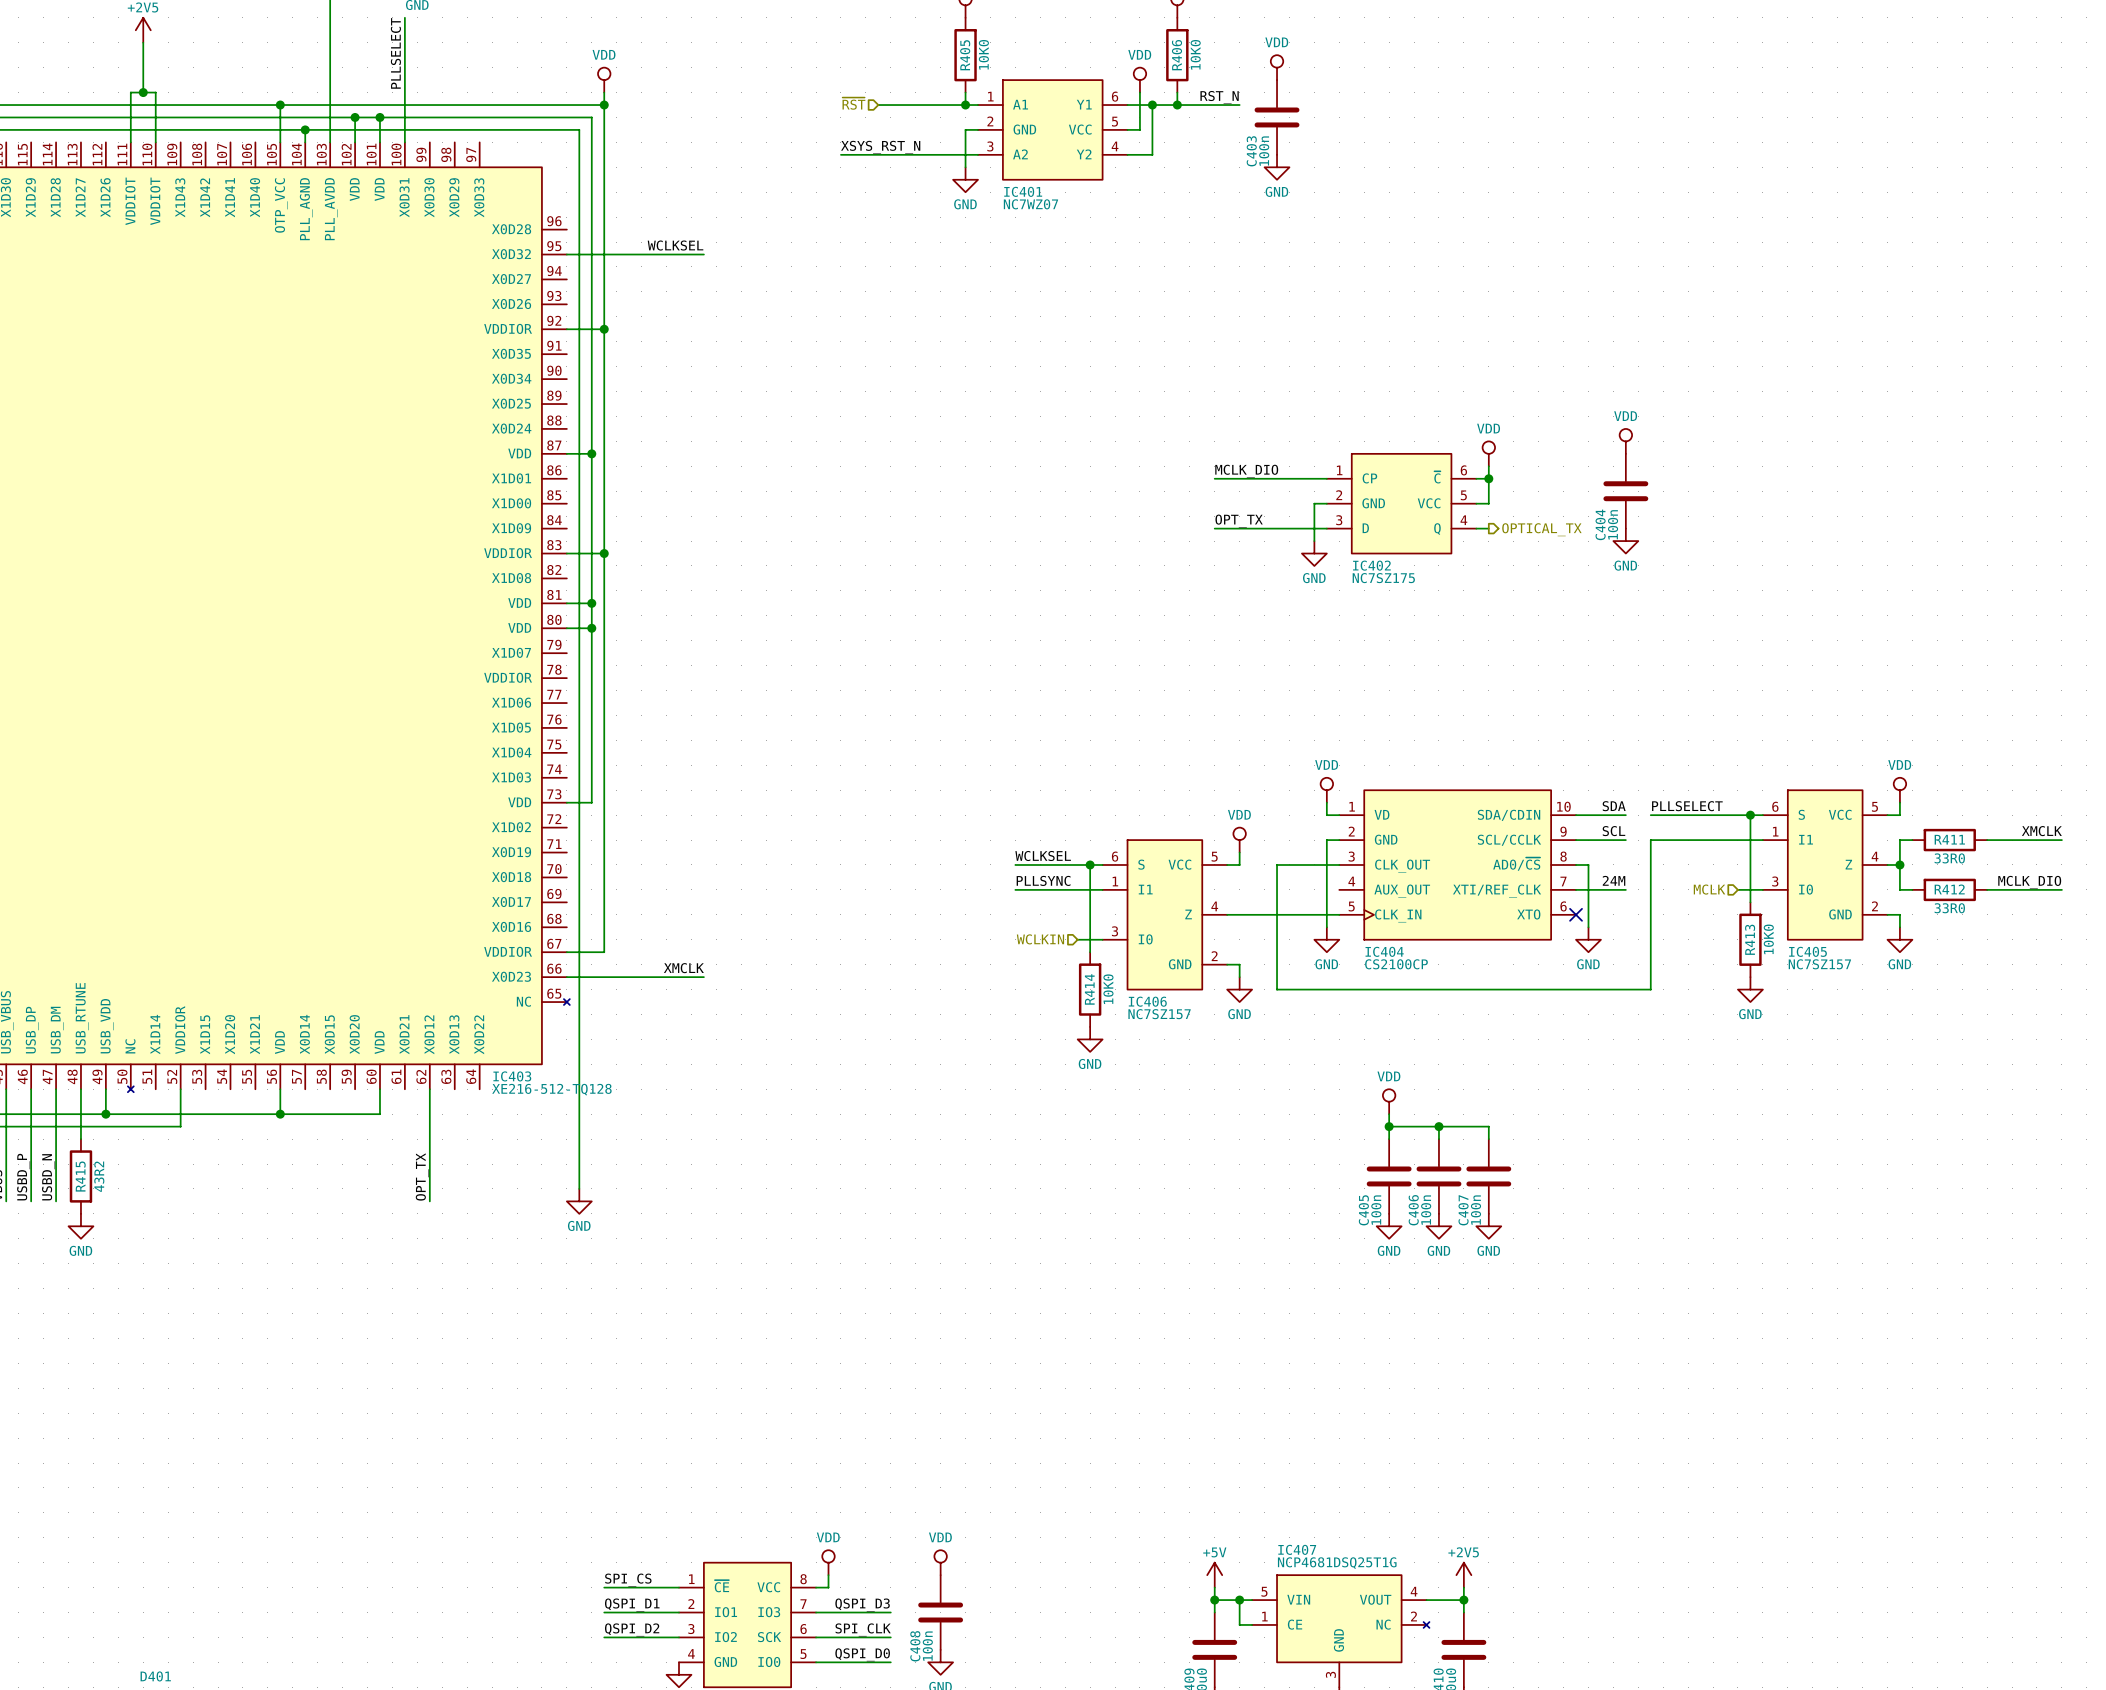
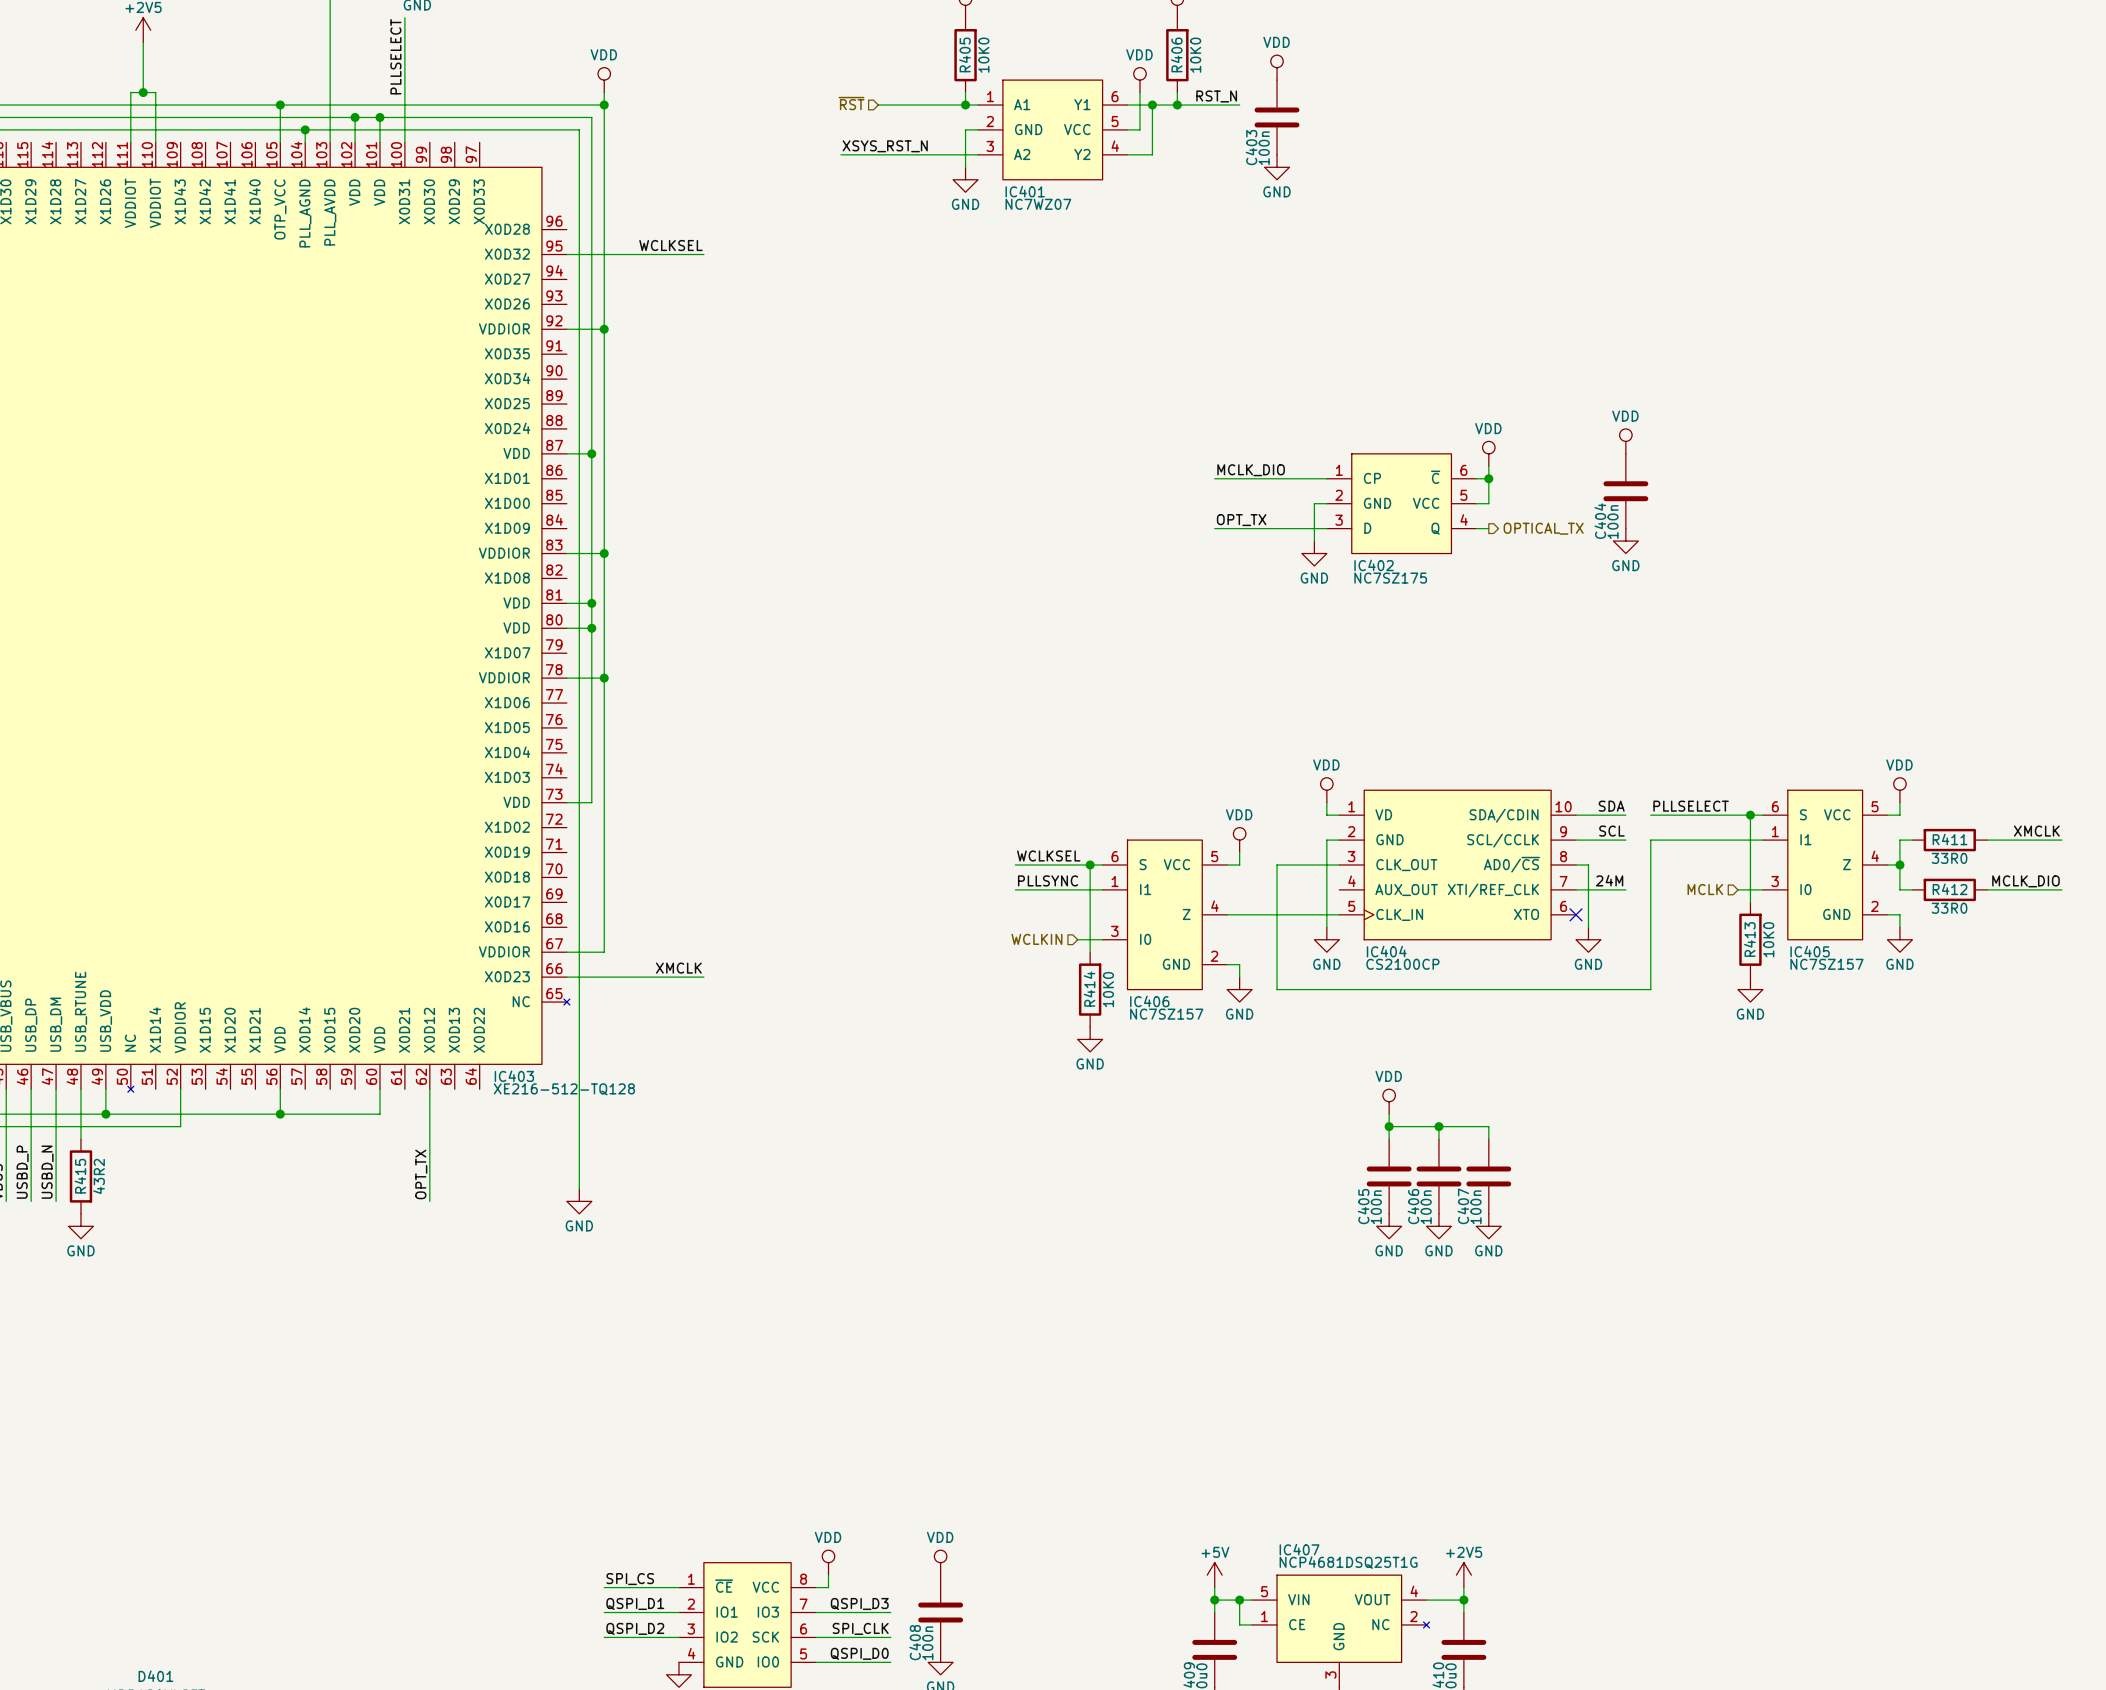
wire: none -> (566, 678) (604, 678)
junction: none -> (604, 678)

